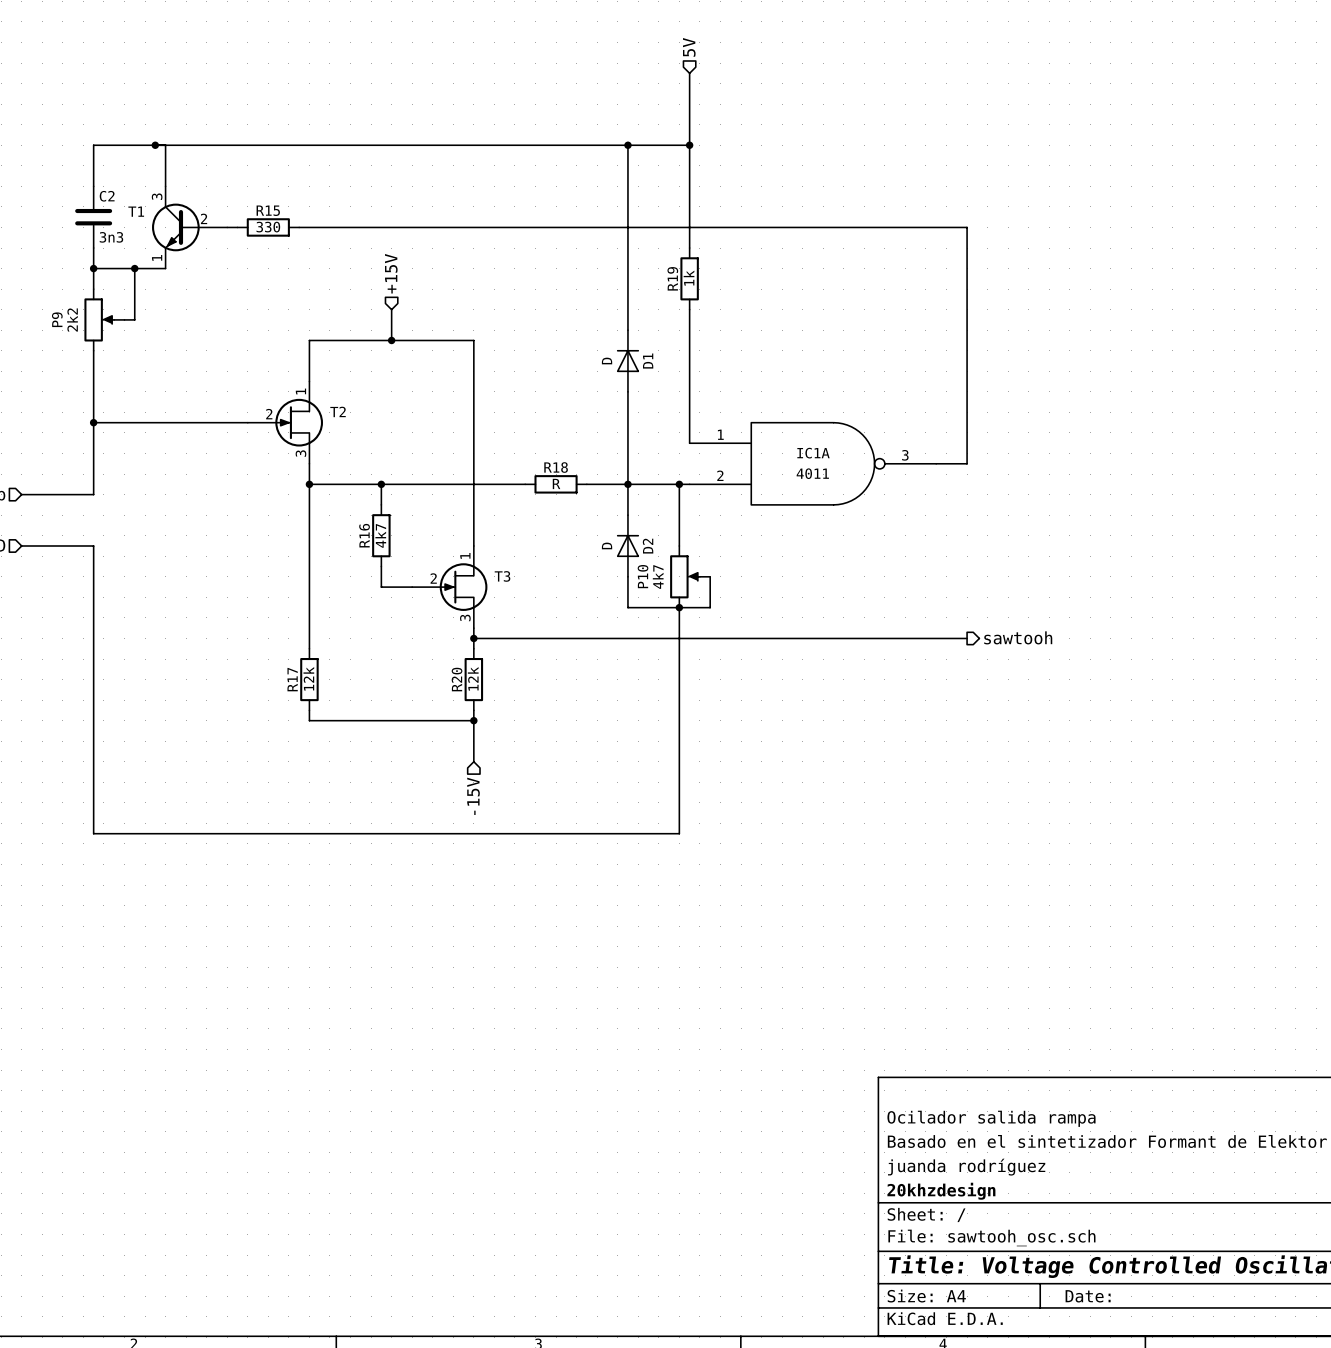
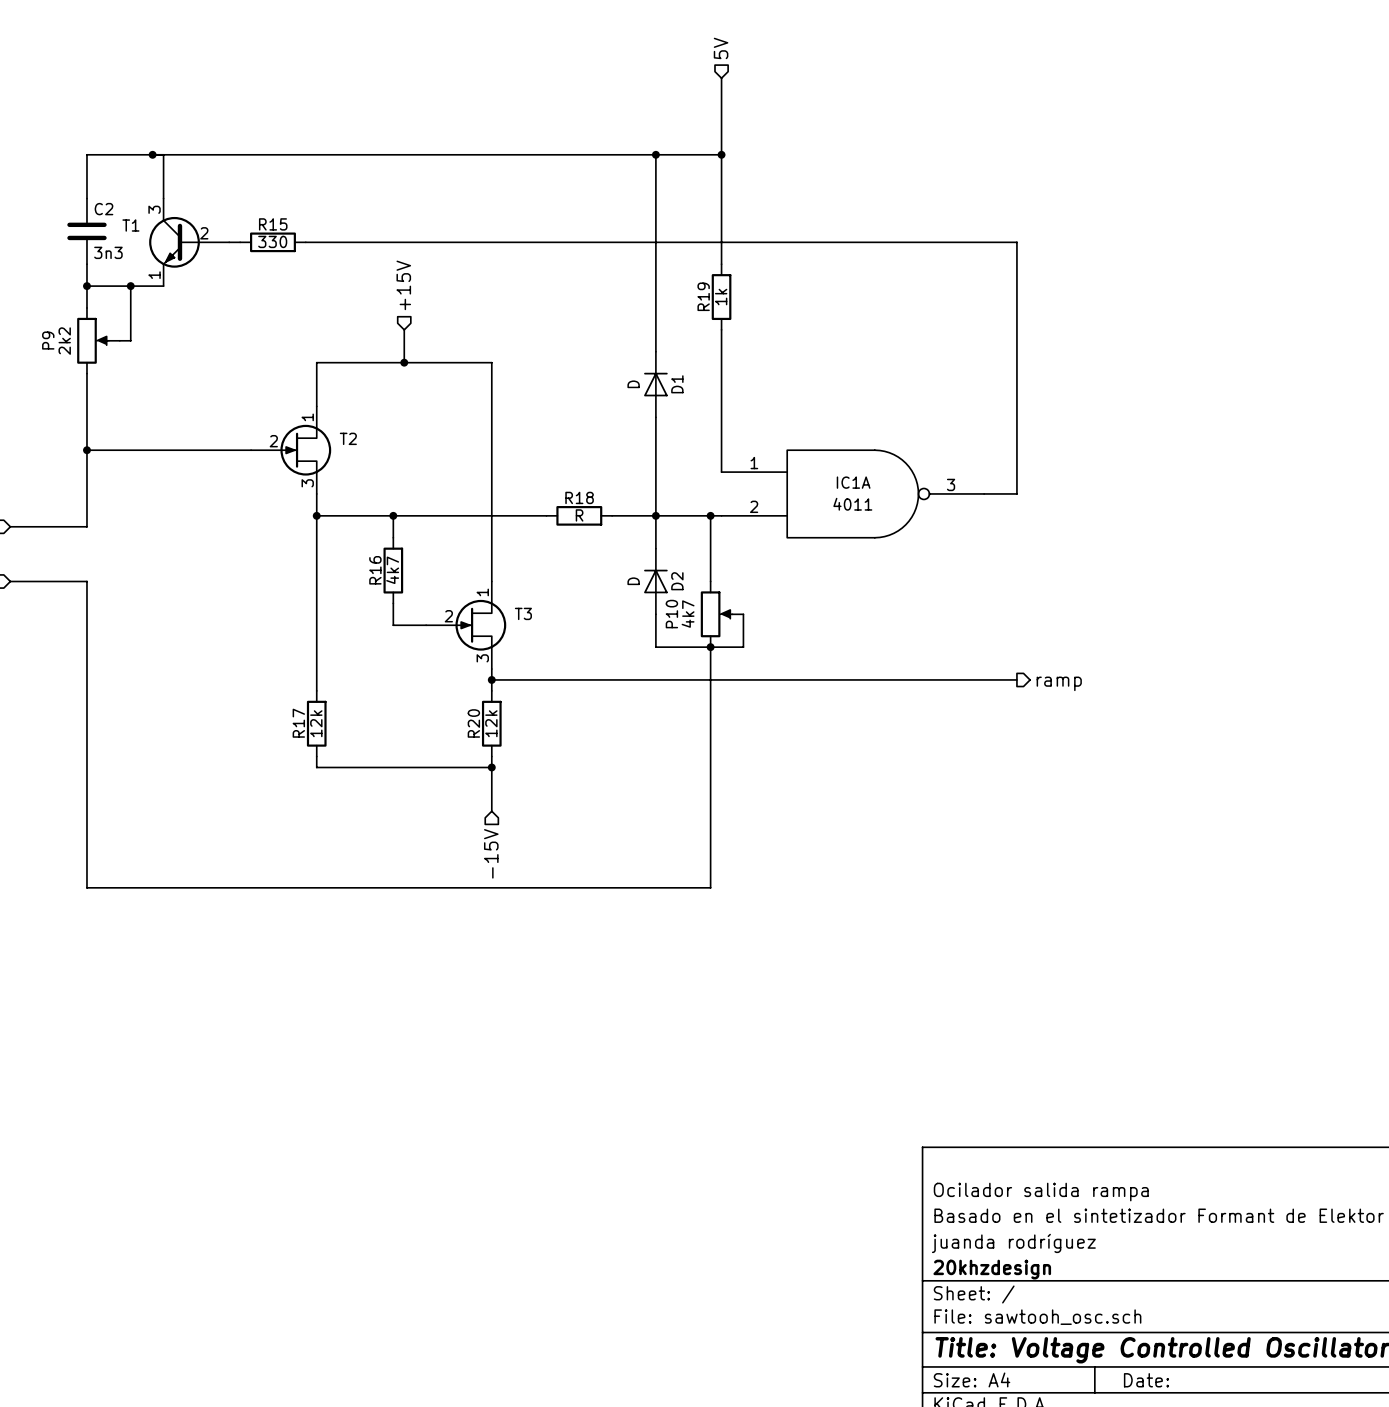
hierarchical label: sawtooh (1018, 637) -> ramp (1059, 683)

